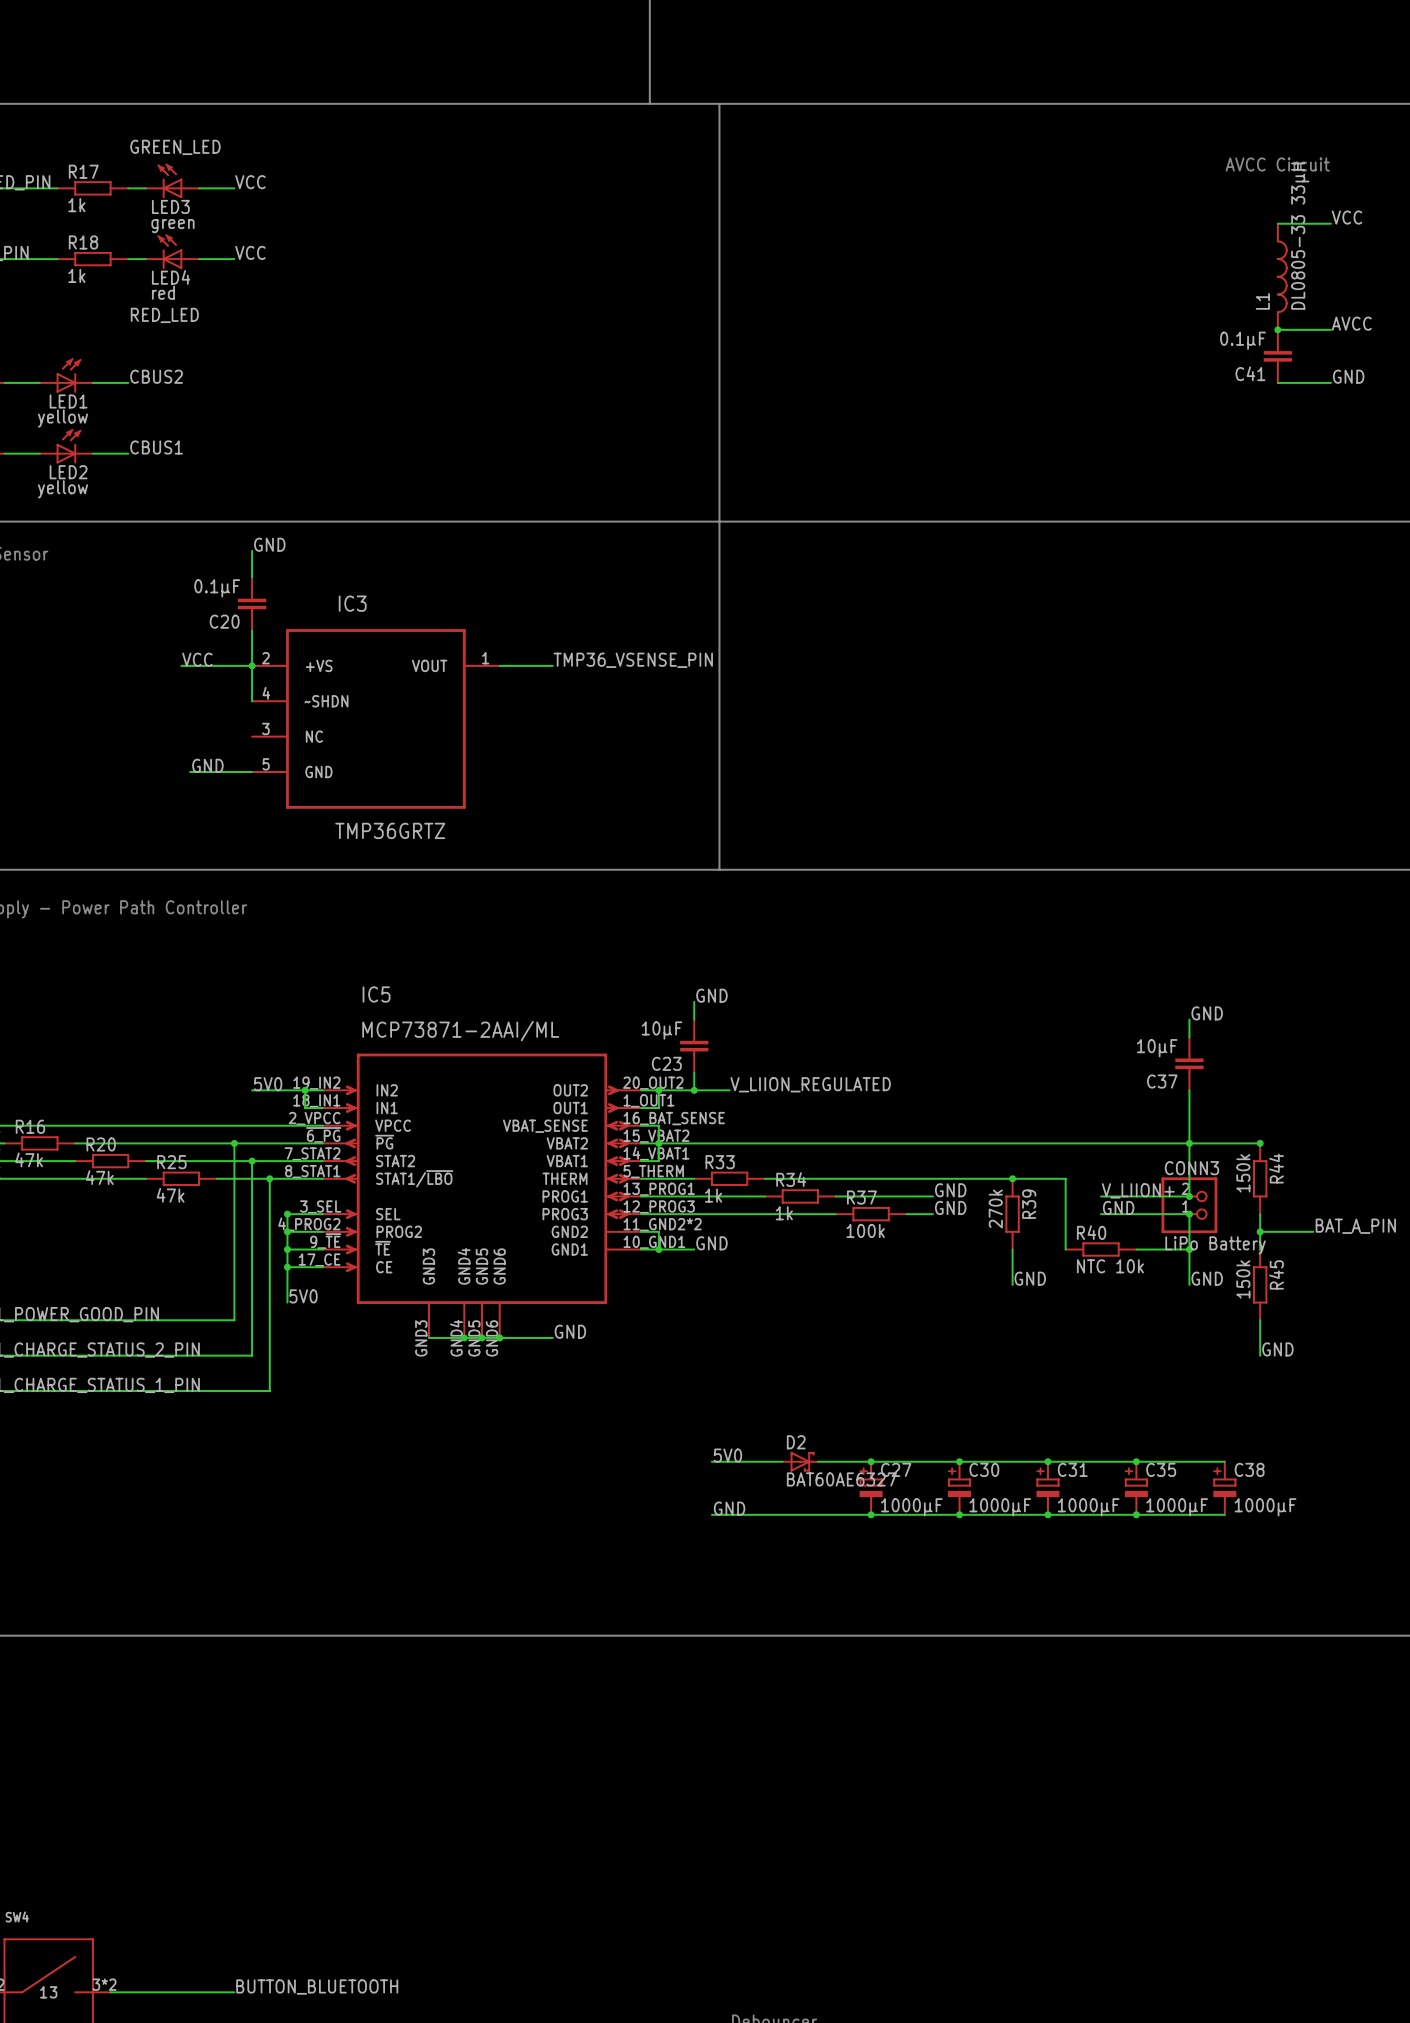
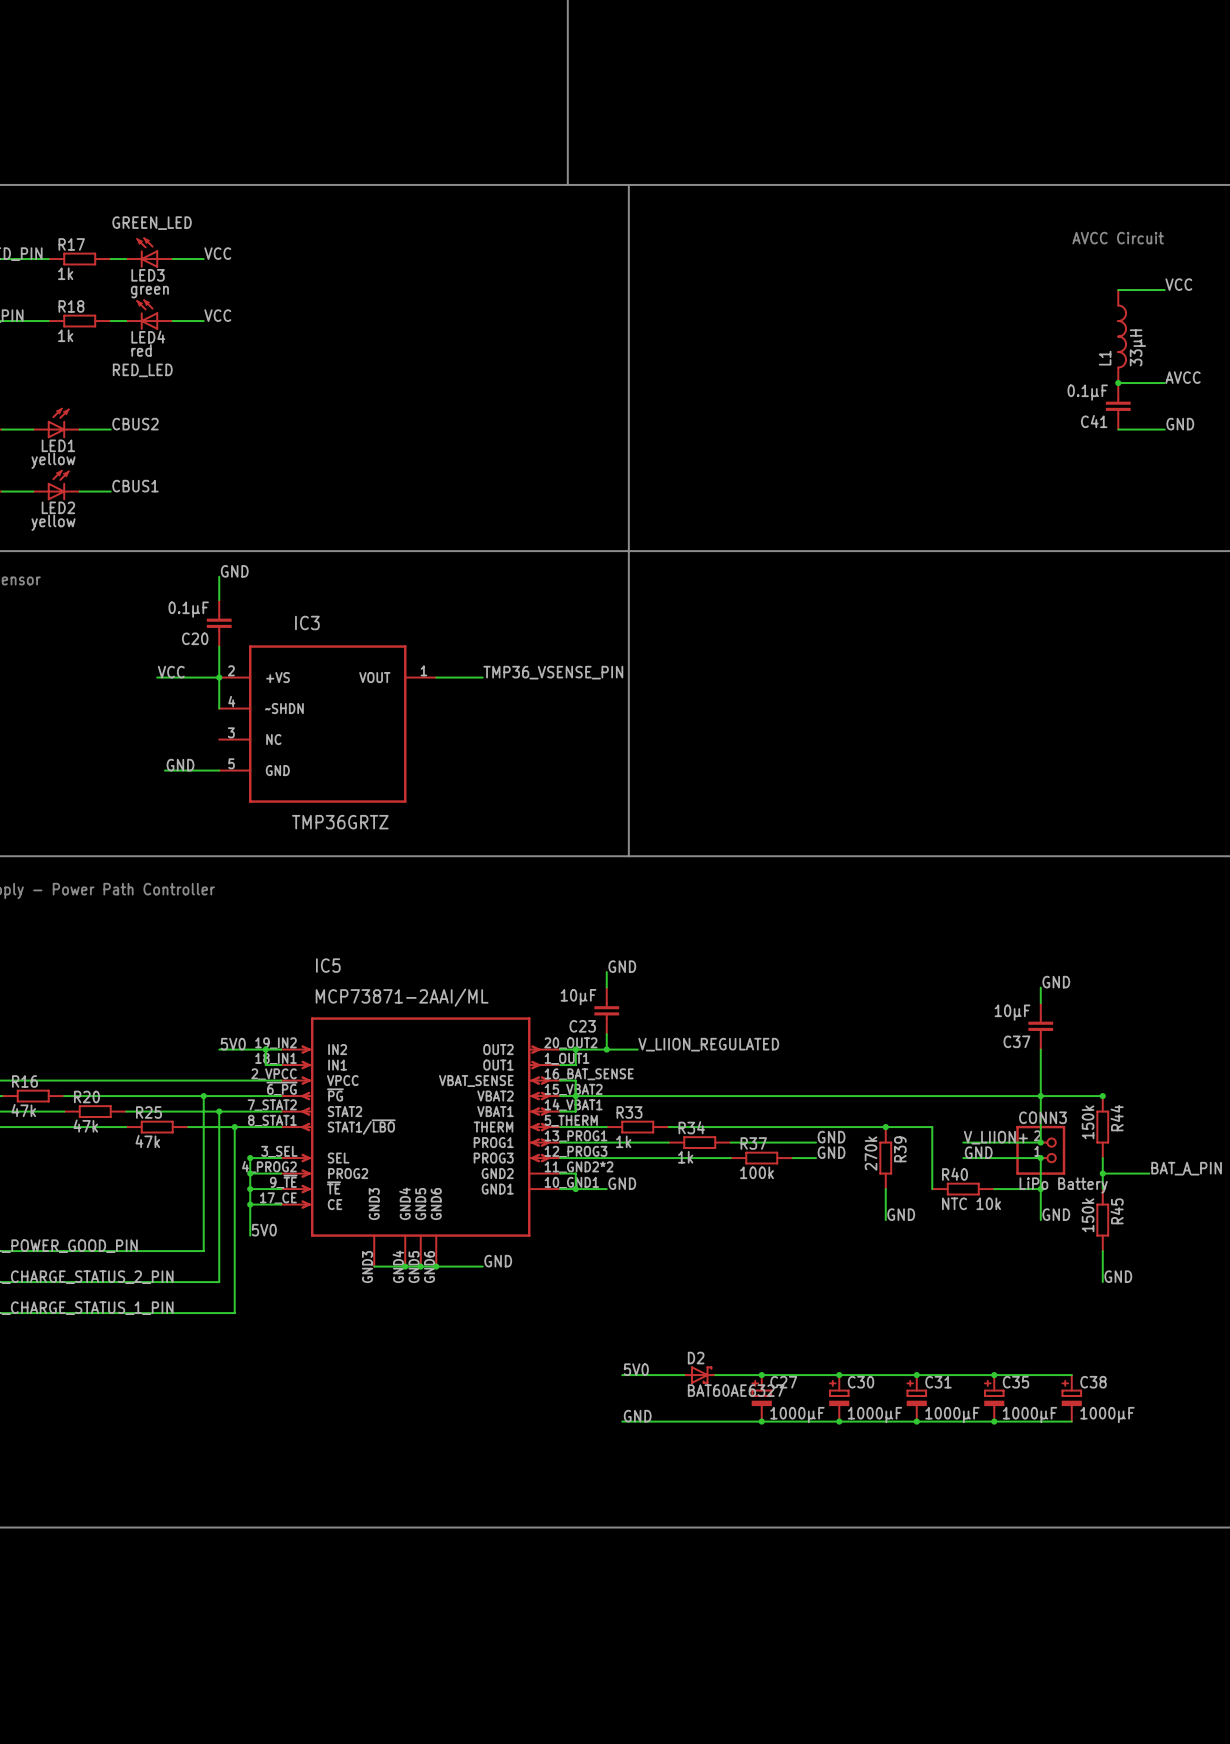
L1 value: DL0805-33 33µH (1300, 236) -> 33µH (1137, 347)

